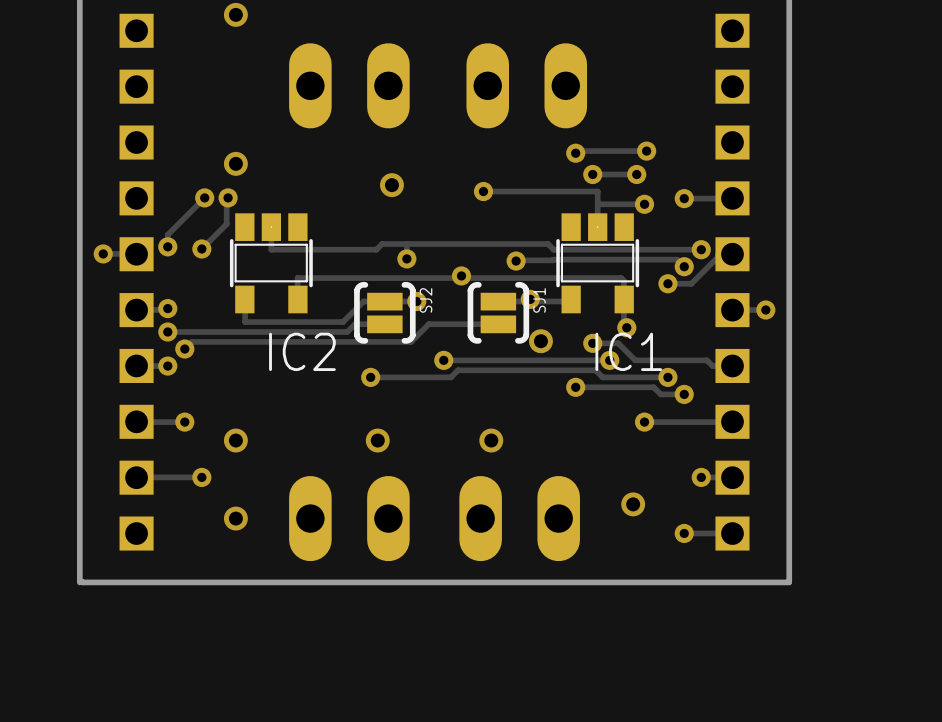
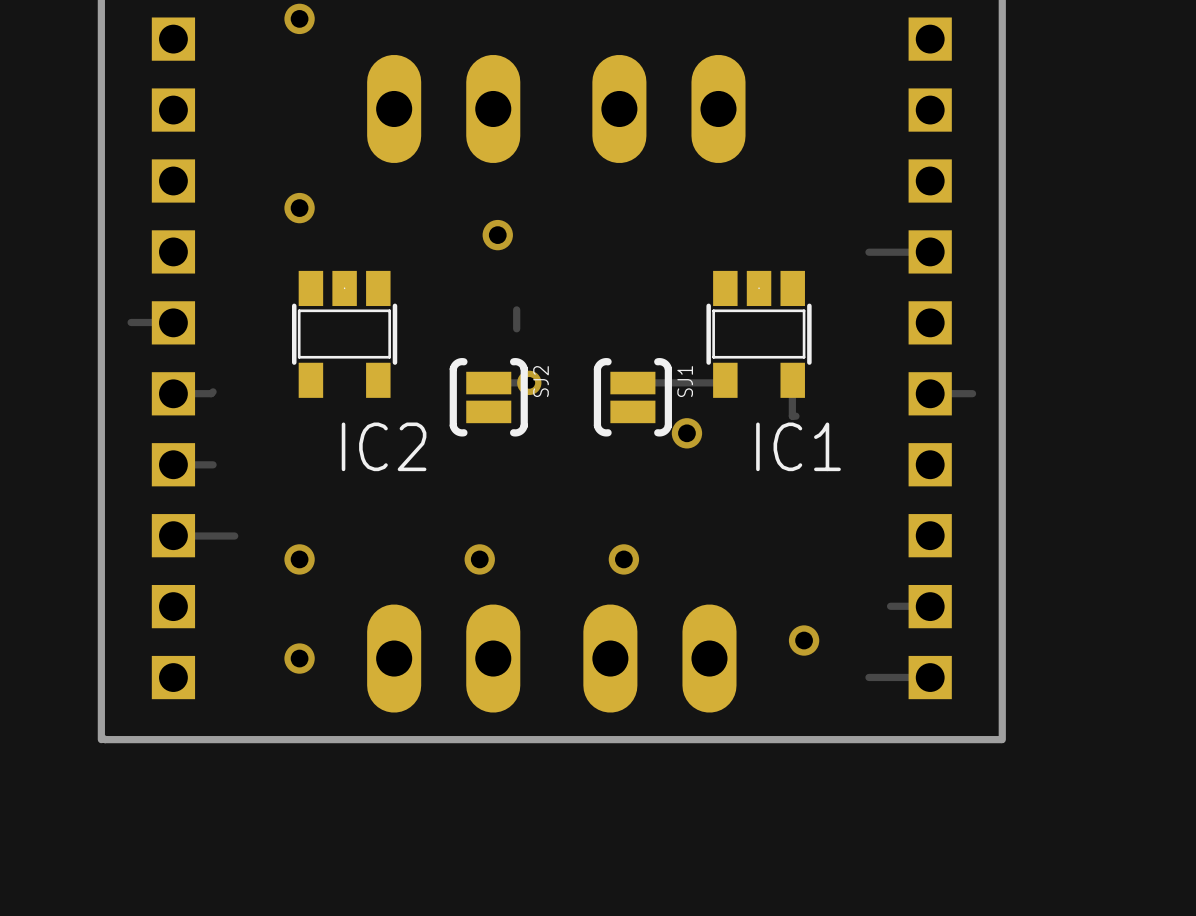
track: (646, 151) (577, 151) (575, 153) -> none
via: (646, 151) -> none
via: (575, 153) -> none
via: (592, 174) -> none
track: (636, 174) (592, 174) -> none
via: (636, 174) -> none
track: (483, 191) (597, 191) (597, 227) -> none
via: (483, 191) -> none
track: (204, 197) (167, 234) (167, 246) -> none
via: (204, 197) -> none
track: (228, 197) (226, 224) (201, 248) -> none
via: (228, 197) -> none
via: (684, 198) -> none
track: (644, 204) (597, 204) -> none
via: (644, 204) -> none
track: (271, 227) (271, 249) (376, 249) (382, 244) (548, 244) (553, 249) (701, 249) -> none
via: (167, 246) -> none
via: (201, 248) -> none
via: (701, 249) -> none
via: (103, 253) -> none
track: (732, 253) (718, 253) (718, 256) (691, 283) (667, 283) -> none
via: (406, 258) -> none
track: (516, 261) (677, 259) (684, 266) -> none
via: (516, 261) -> none
via: (684, 266) -> none
via: (461, 275) -> none
via: (667, 283) -> none
track: (244, 299) (245, 322) (343, 322) (363, 301) (384, 301) -> none
via: (530, 299) -> none
track: (623, 299) (623, 280) (621, 278) (297, 278) (297, 299) -> none
via: (167, 308) -> none
via: (765, 310) -> none
track: (384, 324) (355, 324) (347, 331) (167, 331) -> none
track: (498, 324) (428, 324) (411, 341) (191, 341) (184, 349) -> none
via: (626, 327) -> none
via: (167, 331) -> none
track: (592, 343) (618, 343) (635, 360) (706, 360) (712, 366) (732, 366) -> none
via: (592, 343) -> none
via: (184, 349) -> none
via: (443, 360) -> none
track: (609, 360) (443, 360) -> none
via: (609, 360) -> none
via: (167, 366) -> none
via: (370, 377) -> none
track: (667, 377) (602, 377) (595, 370) (457, 370) (450, 377) (370, 377) -> none
via: (667, 377) -> none
track: (575, 387) (653, 387) (660, 394) (684, 394) -> none
via: (575, 387) -> none
via: (684, 394) -> none
via: (184, 422) -> none
via: (644, 422) -> none
track: (732, 422) (644, 422) -> none
track: (201, 477) (136, 477) -> none
via: (201, 477) -> none
via: (701, 477) -> none
via: (684, 533) -> none

